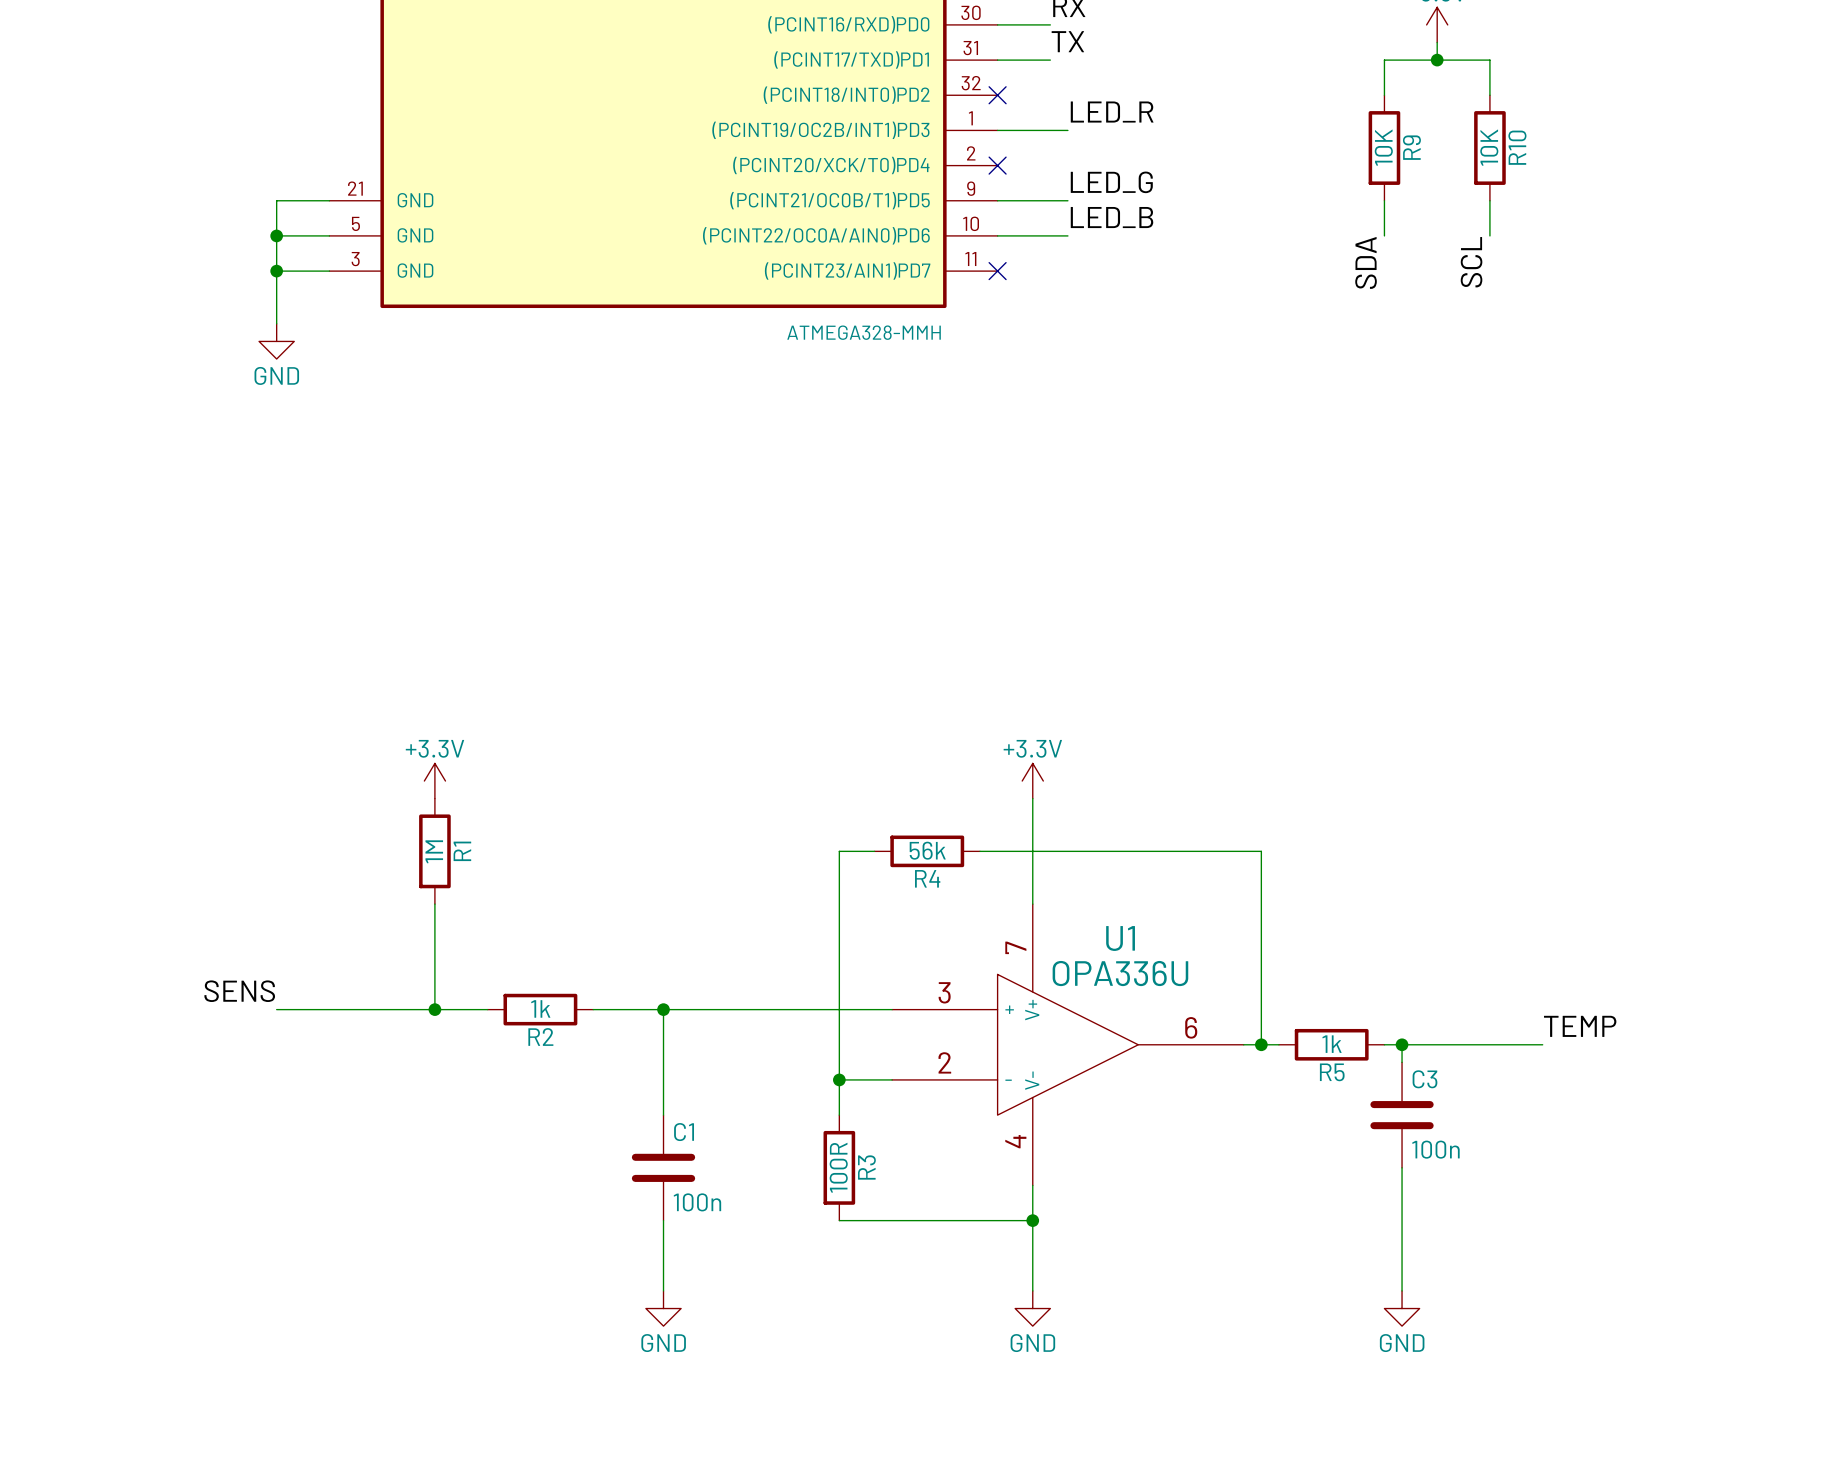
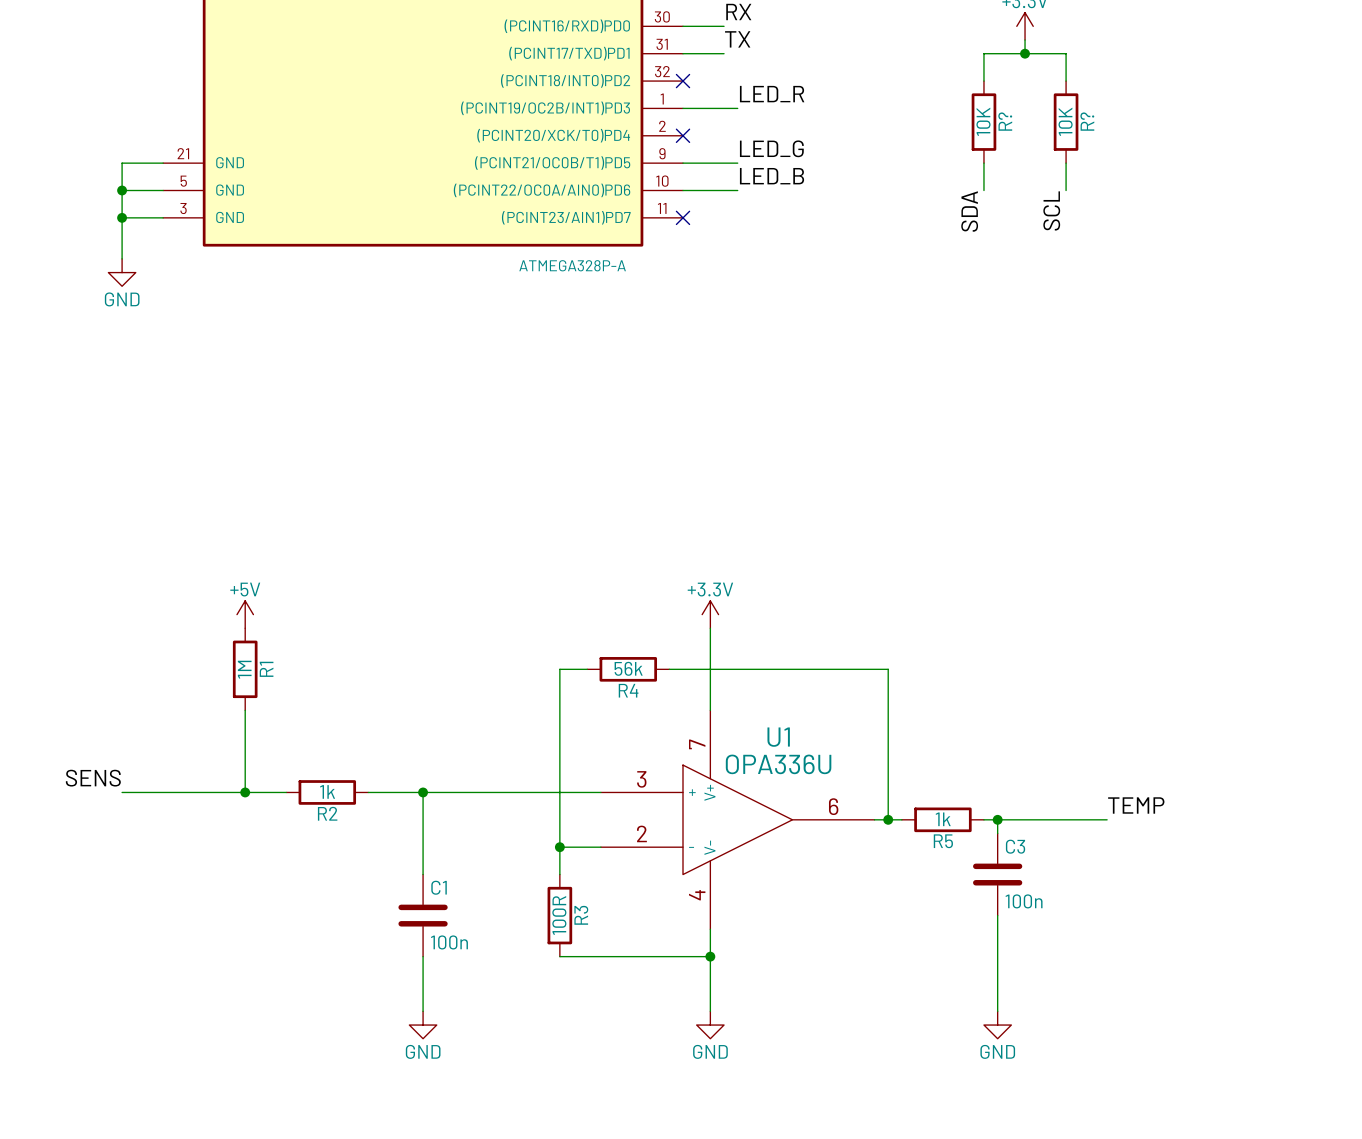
R9 name: R9 (1411, 147) -> R? (1005, 121)
R10 name: R10 (1517, 147) -> R? (1087, 121)
part value: ATMEGA328-MMH (864, 332) -> ATMEGA328P-A (572, 265)
power symbol: +3.3V (434, 781) -> +5V (245, 614)

